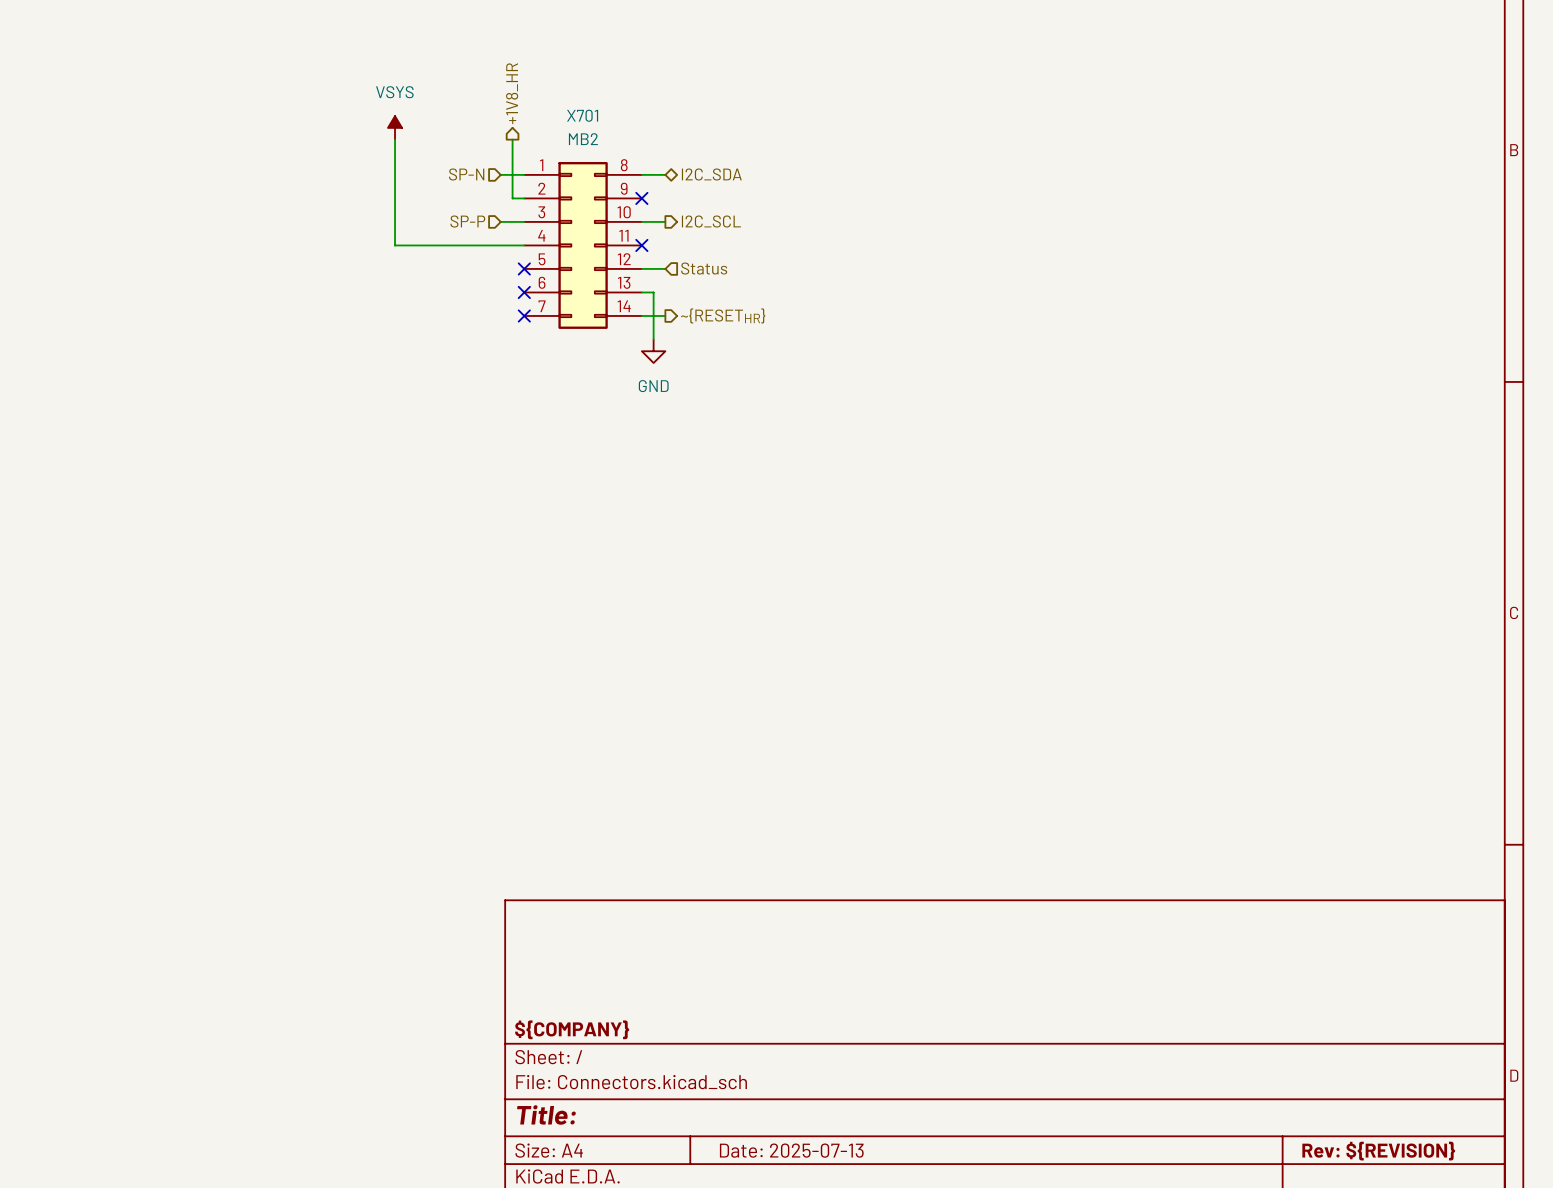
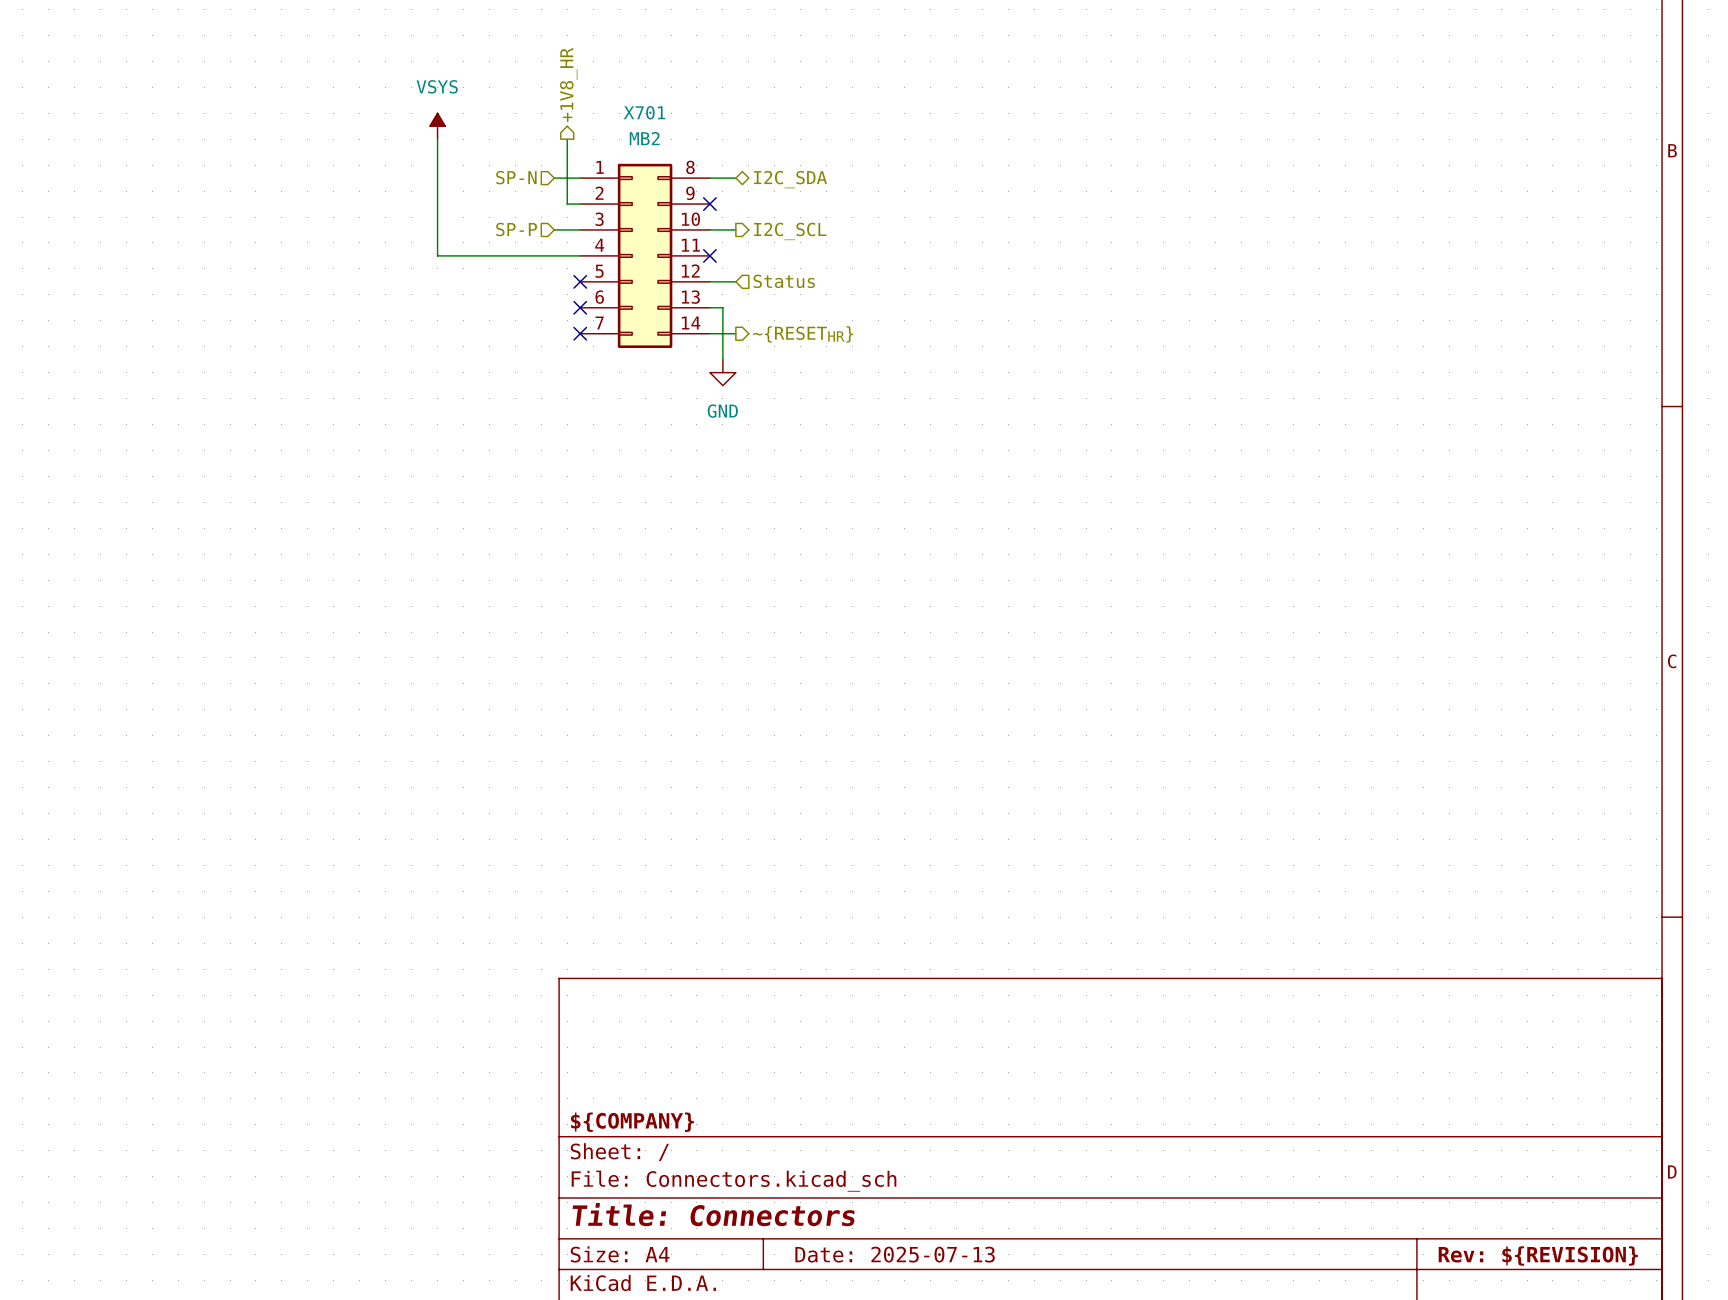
title block: Title: (546, 1114) -> Title: Connectors (713, 1214)

